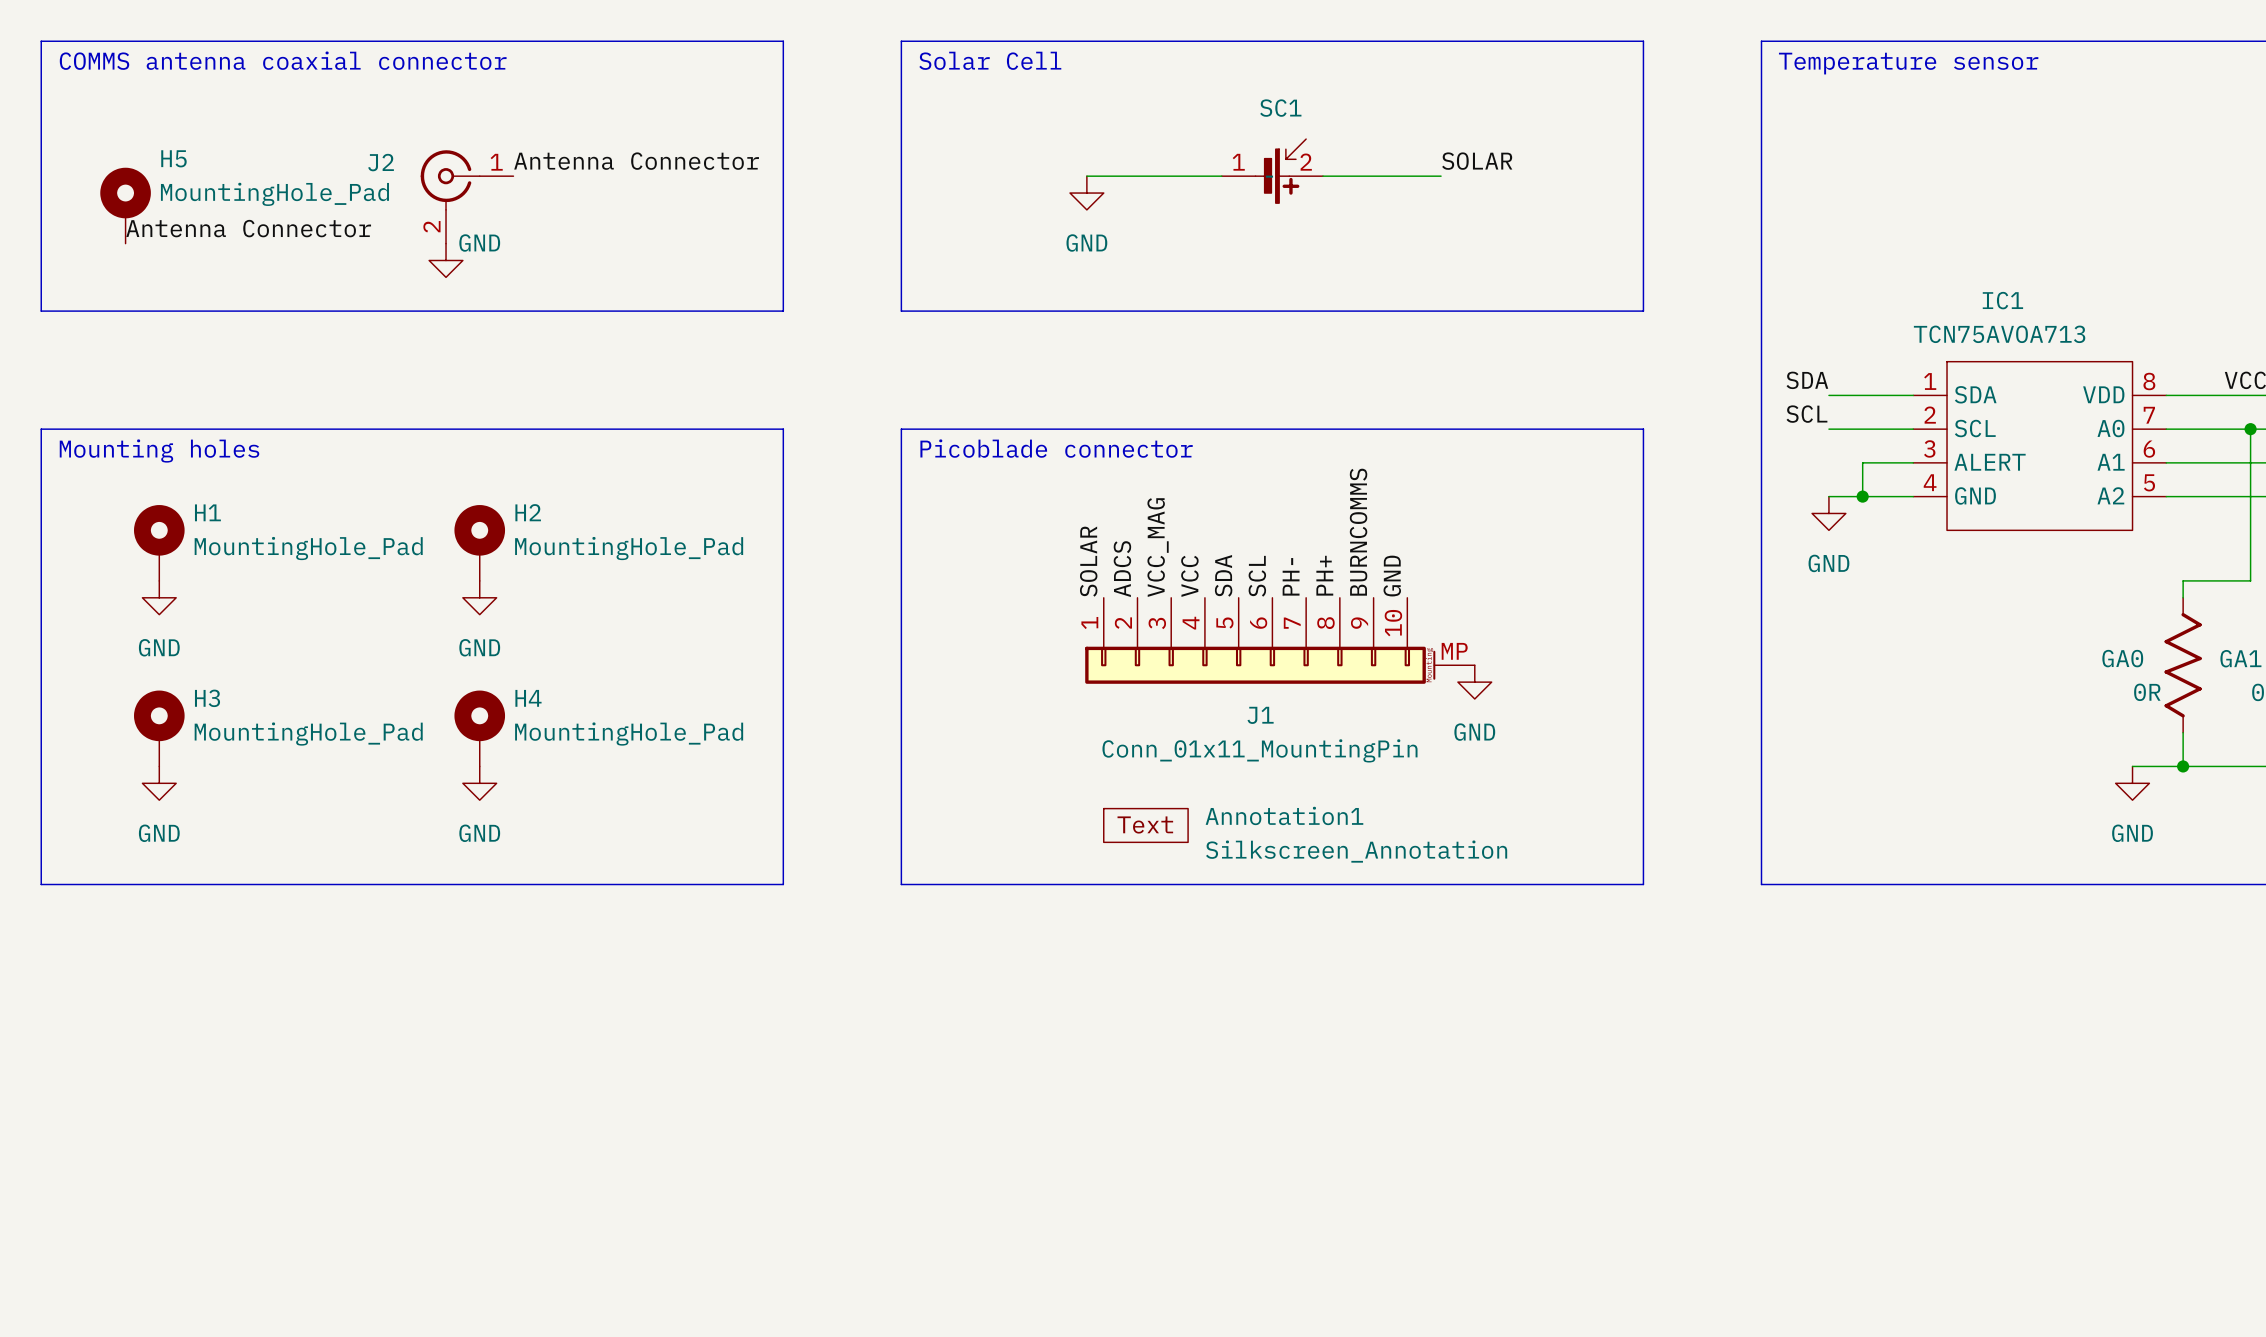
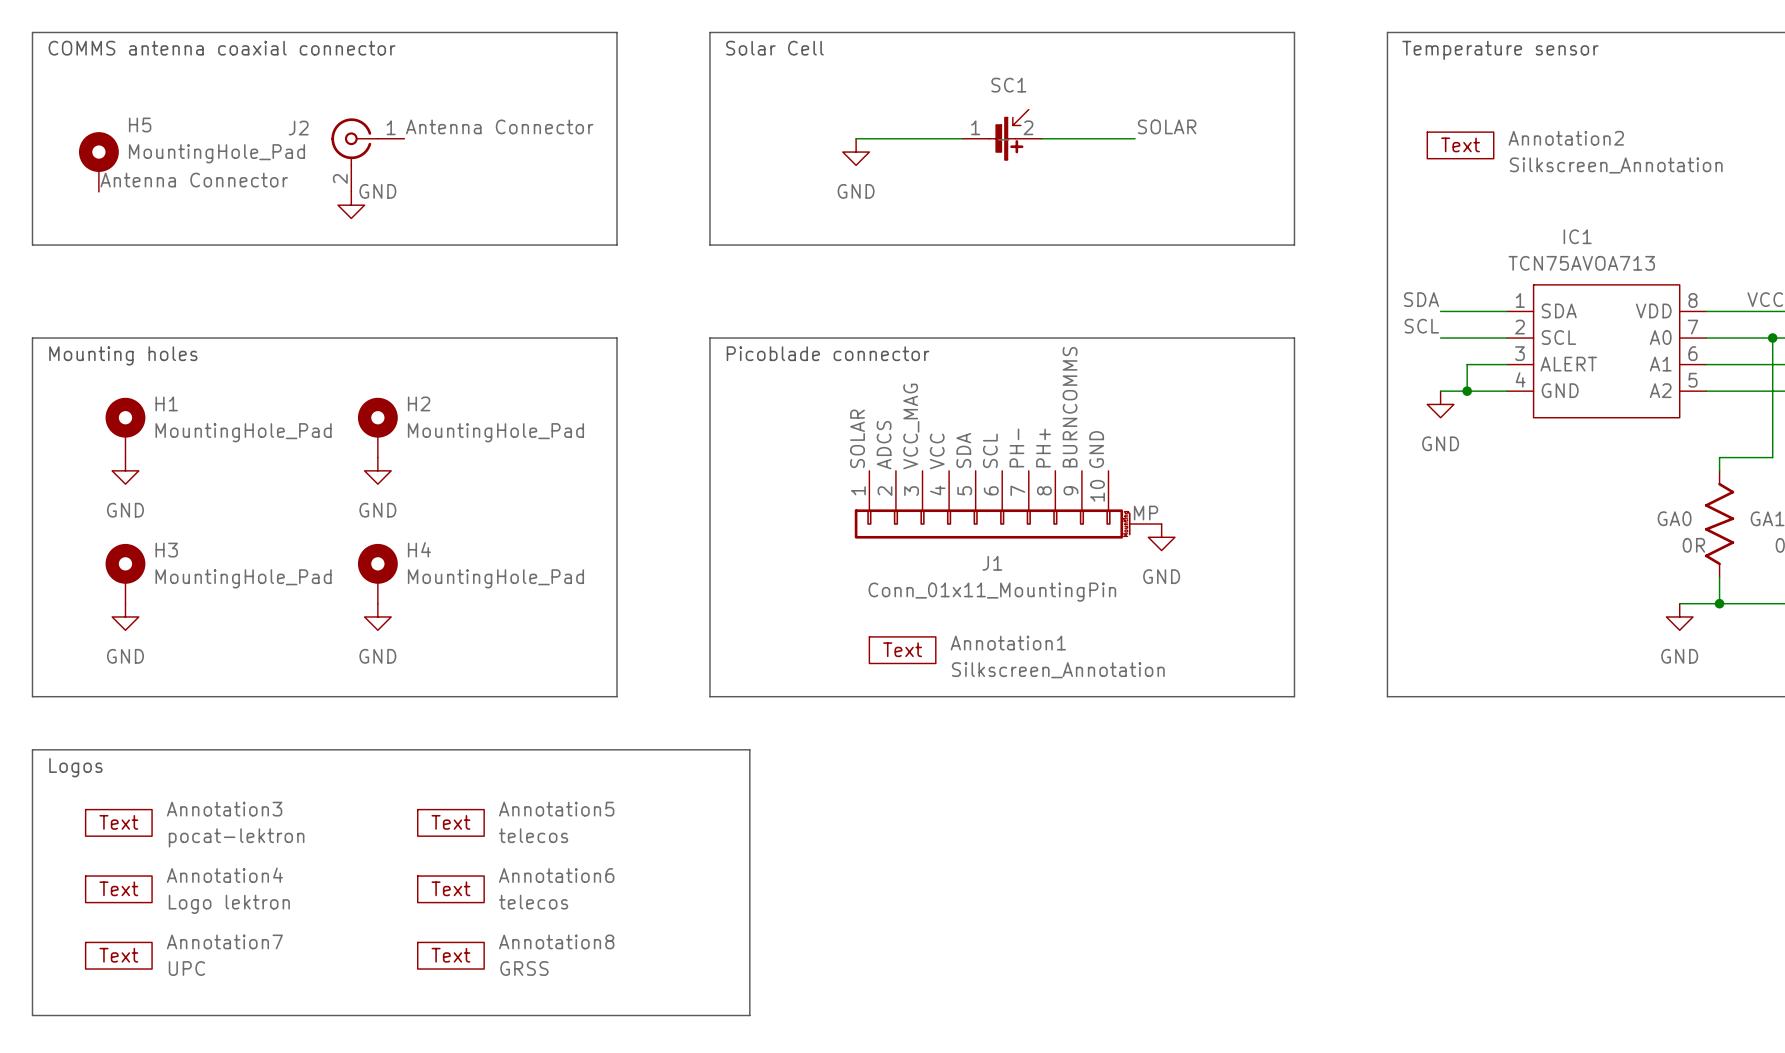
Annotation2: none -> Silkscreen_Annotation (1460, 145)
line: none -> (32, 749) (32, 1015) (749, 1015) (749, 749) (32, 749)
text: none -> Logos (75, 767)
Annotation3: none -> pocat-lektron (118, 822)
Annotation5: none -> telecos (450, 822)
Annotation4: none -> Logo lektron (118, 889)
Annotation6: none -> telecos (450, 889)
Annotation7: none -> UPC (118, 955)
Annotation8: none -> GRSS (450, 955)

